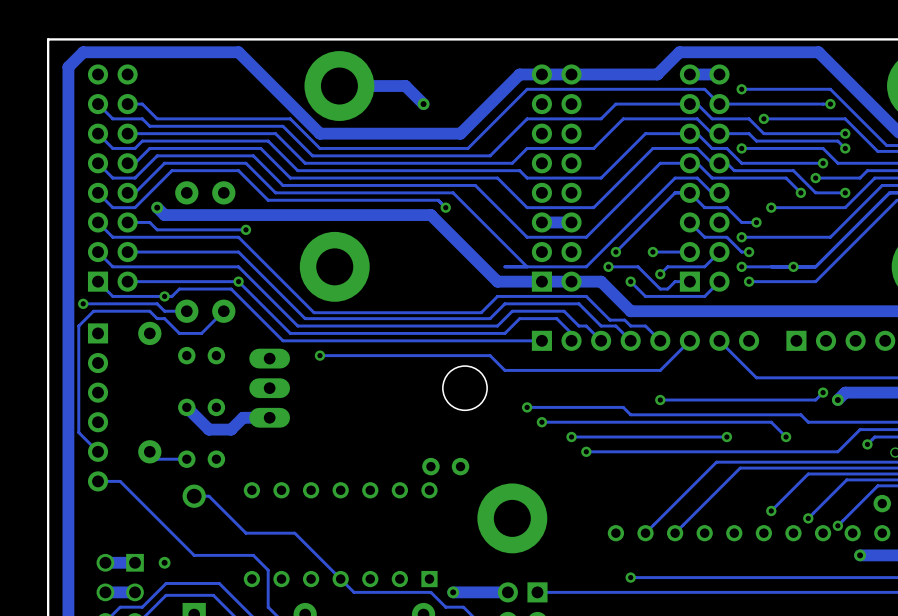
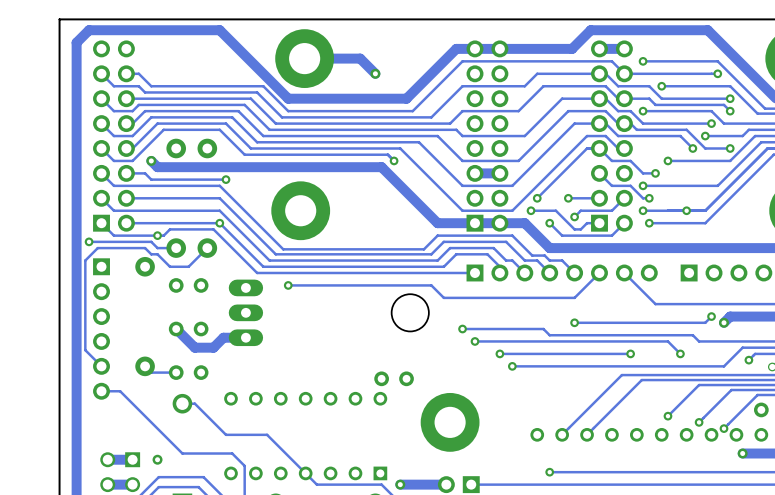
track: (527, 266) (504, 266) -> none

